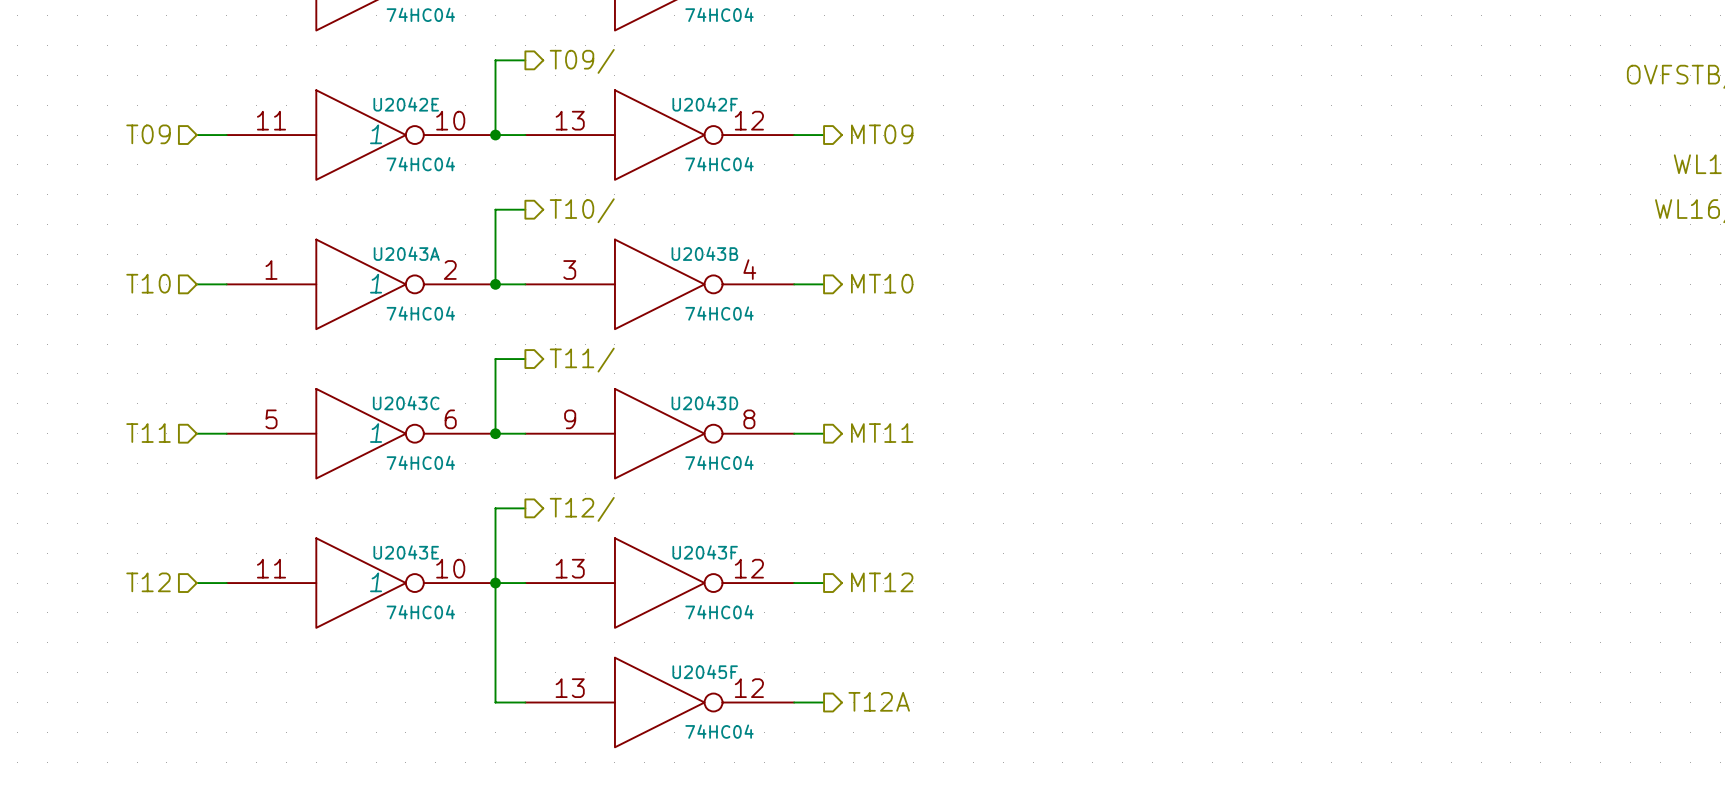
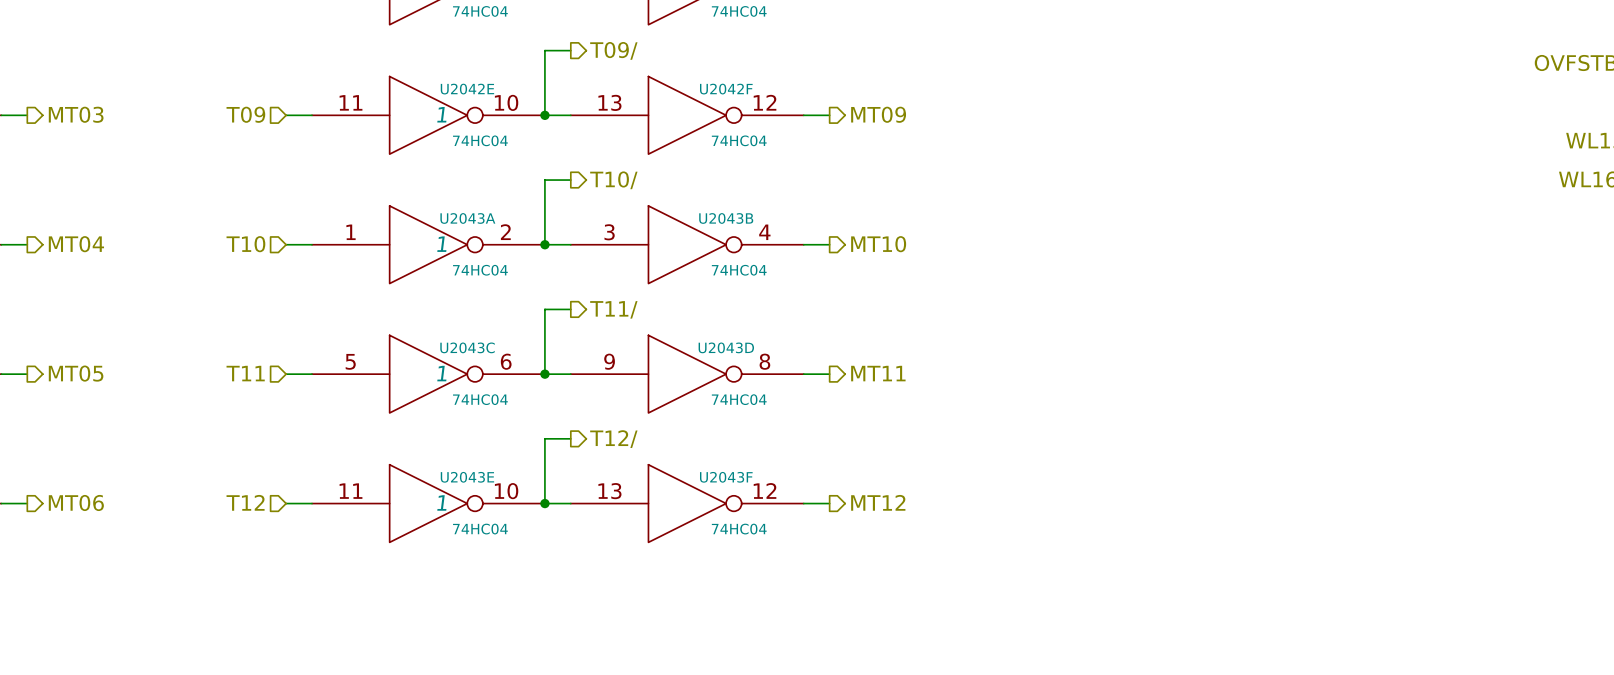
wire: (495, 583) (495, 702) (525, 702) -> none
hierarchical label: T12A (879, 701) -> none
U2045F: 74HC04 (659, 702) -> none
wire: (794, 702) (824, 702) -> none

